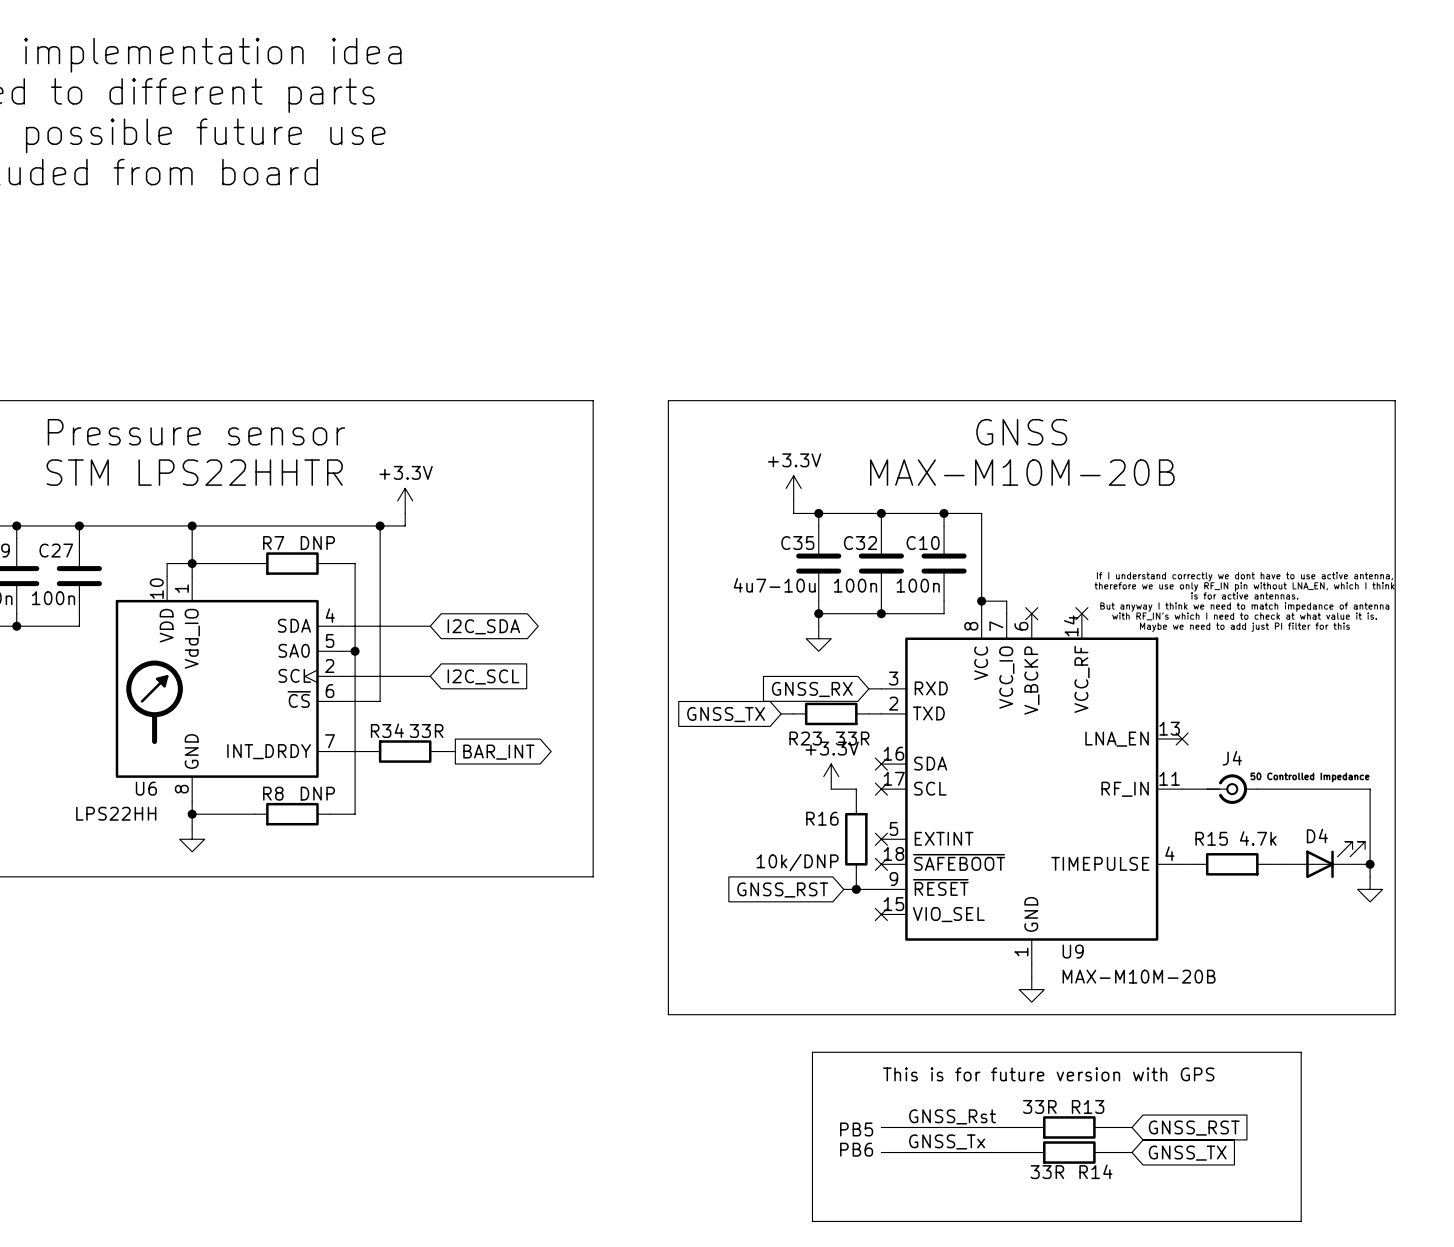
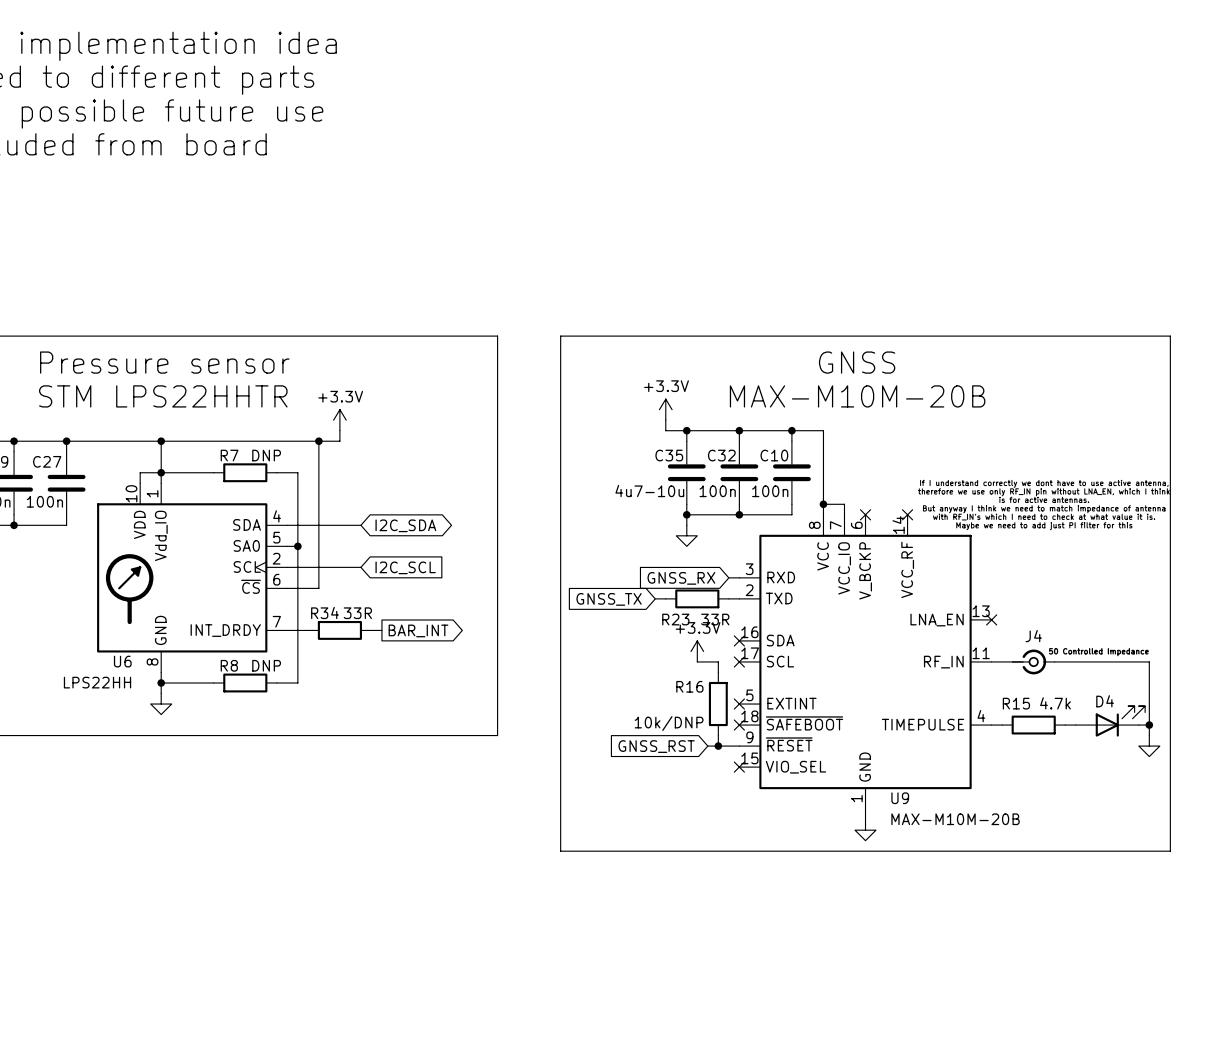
line: (812, 1052) (1301, 1052) (1301, 1221) (812, 1221) (812, 1052) -> none
text: This is for future version with GPS (1048, 1074) -> none
label: GNSS_Rst (952, 1116) -> none
wire: (881, 1127) (1031, 1127) -> none
R13: 33R (1069, 1127) -> none
wire: (1106, 1127) (1132, 1127) -> none
global label: GNSS_RST (1194, 1128) -> none
text: PB5 (856, 1129) -> none
label: GNSS_Tx (947, 1141) -> none
text: PB6 (856, 1149) -> none
wire: (881, 1152) (1031, 1152) -> none
R14: 33R (1069, 1152) -> none
wire: (1106, 1152) (1132, 1152) -> none
global label: GNSS_TX (1187, 1153) -> none

